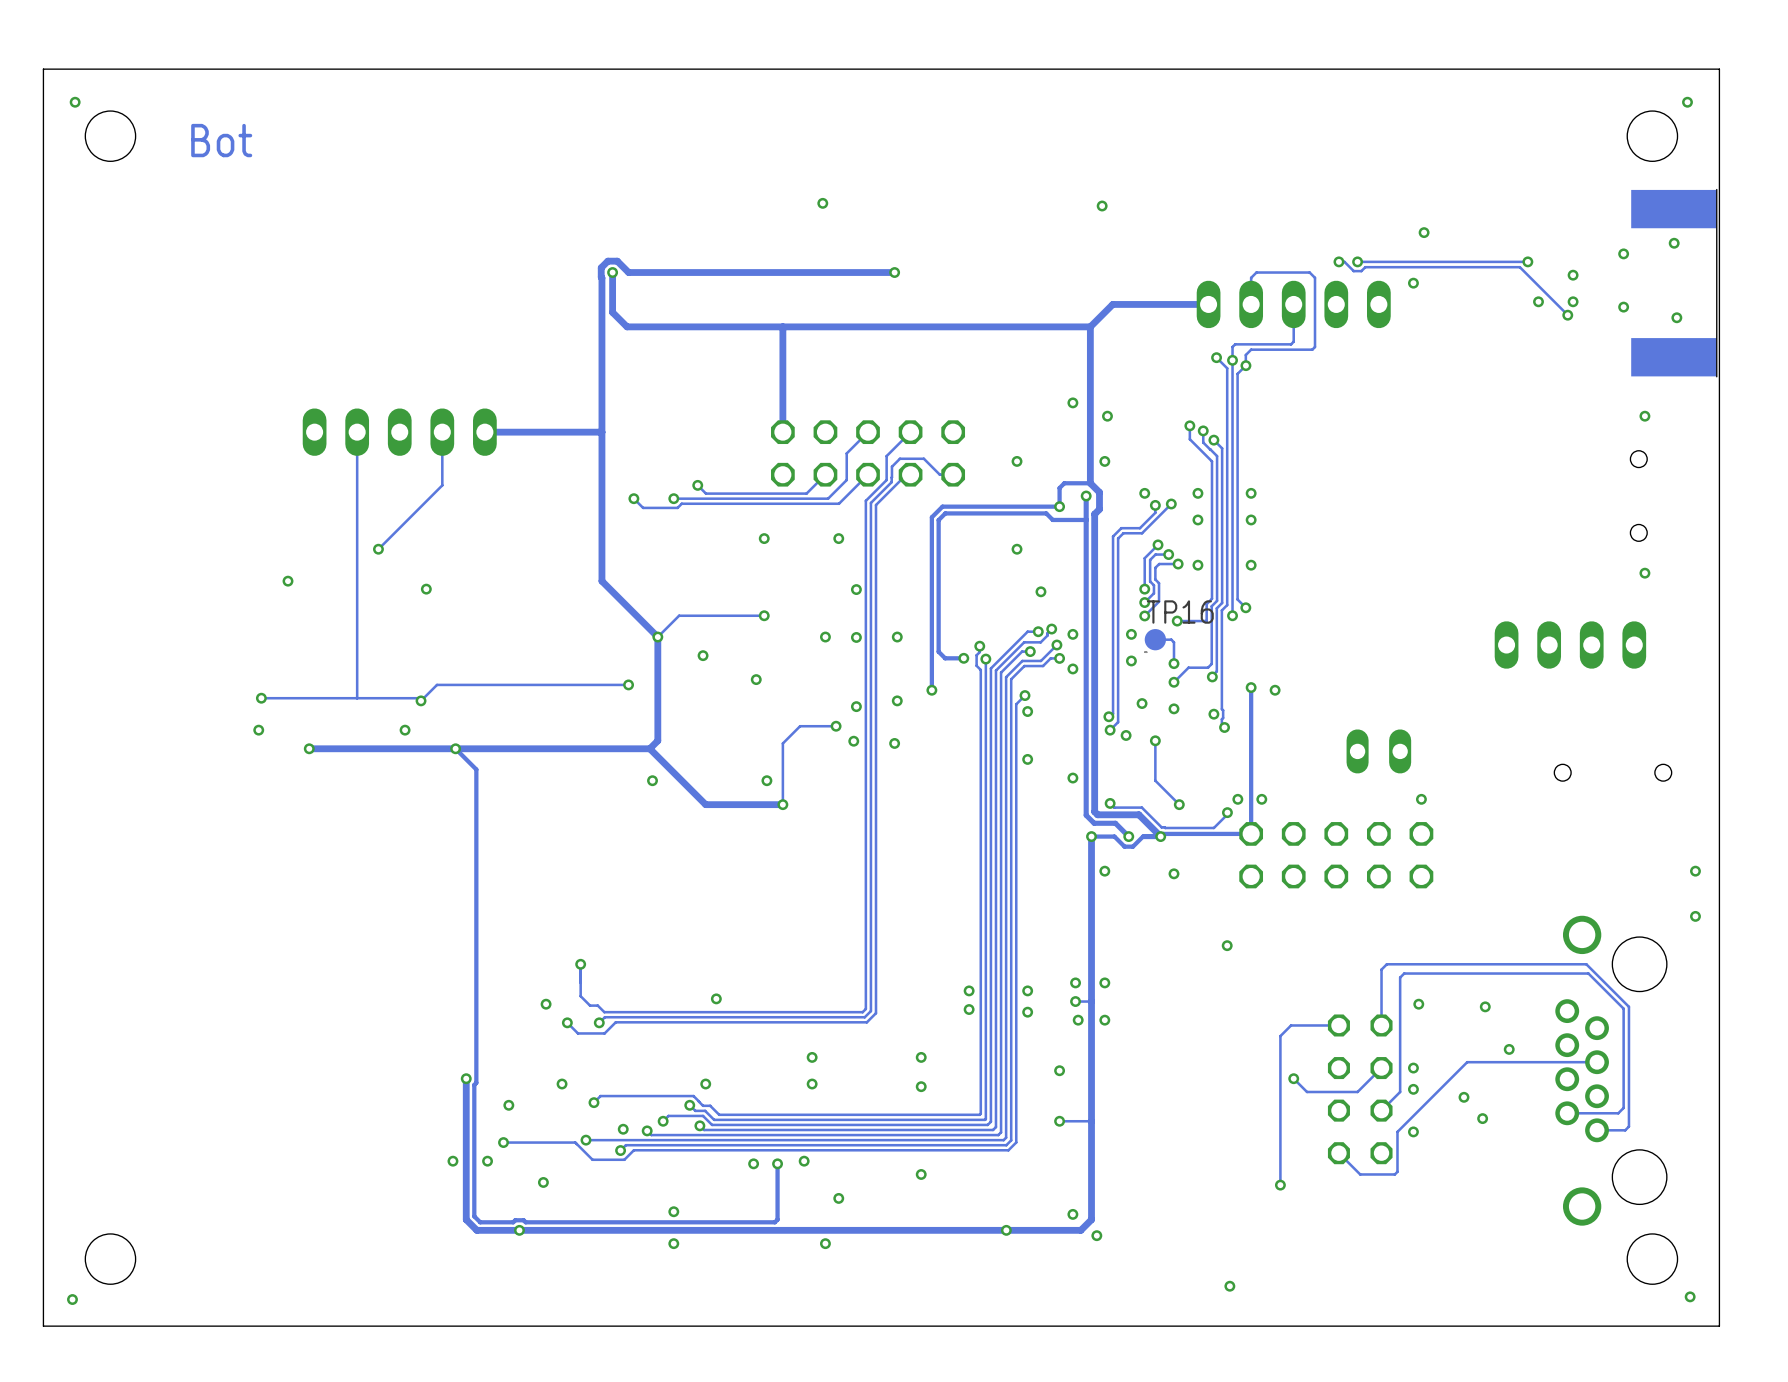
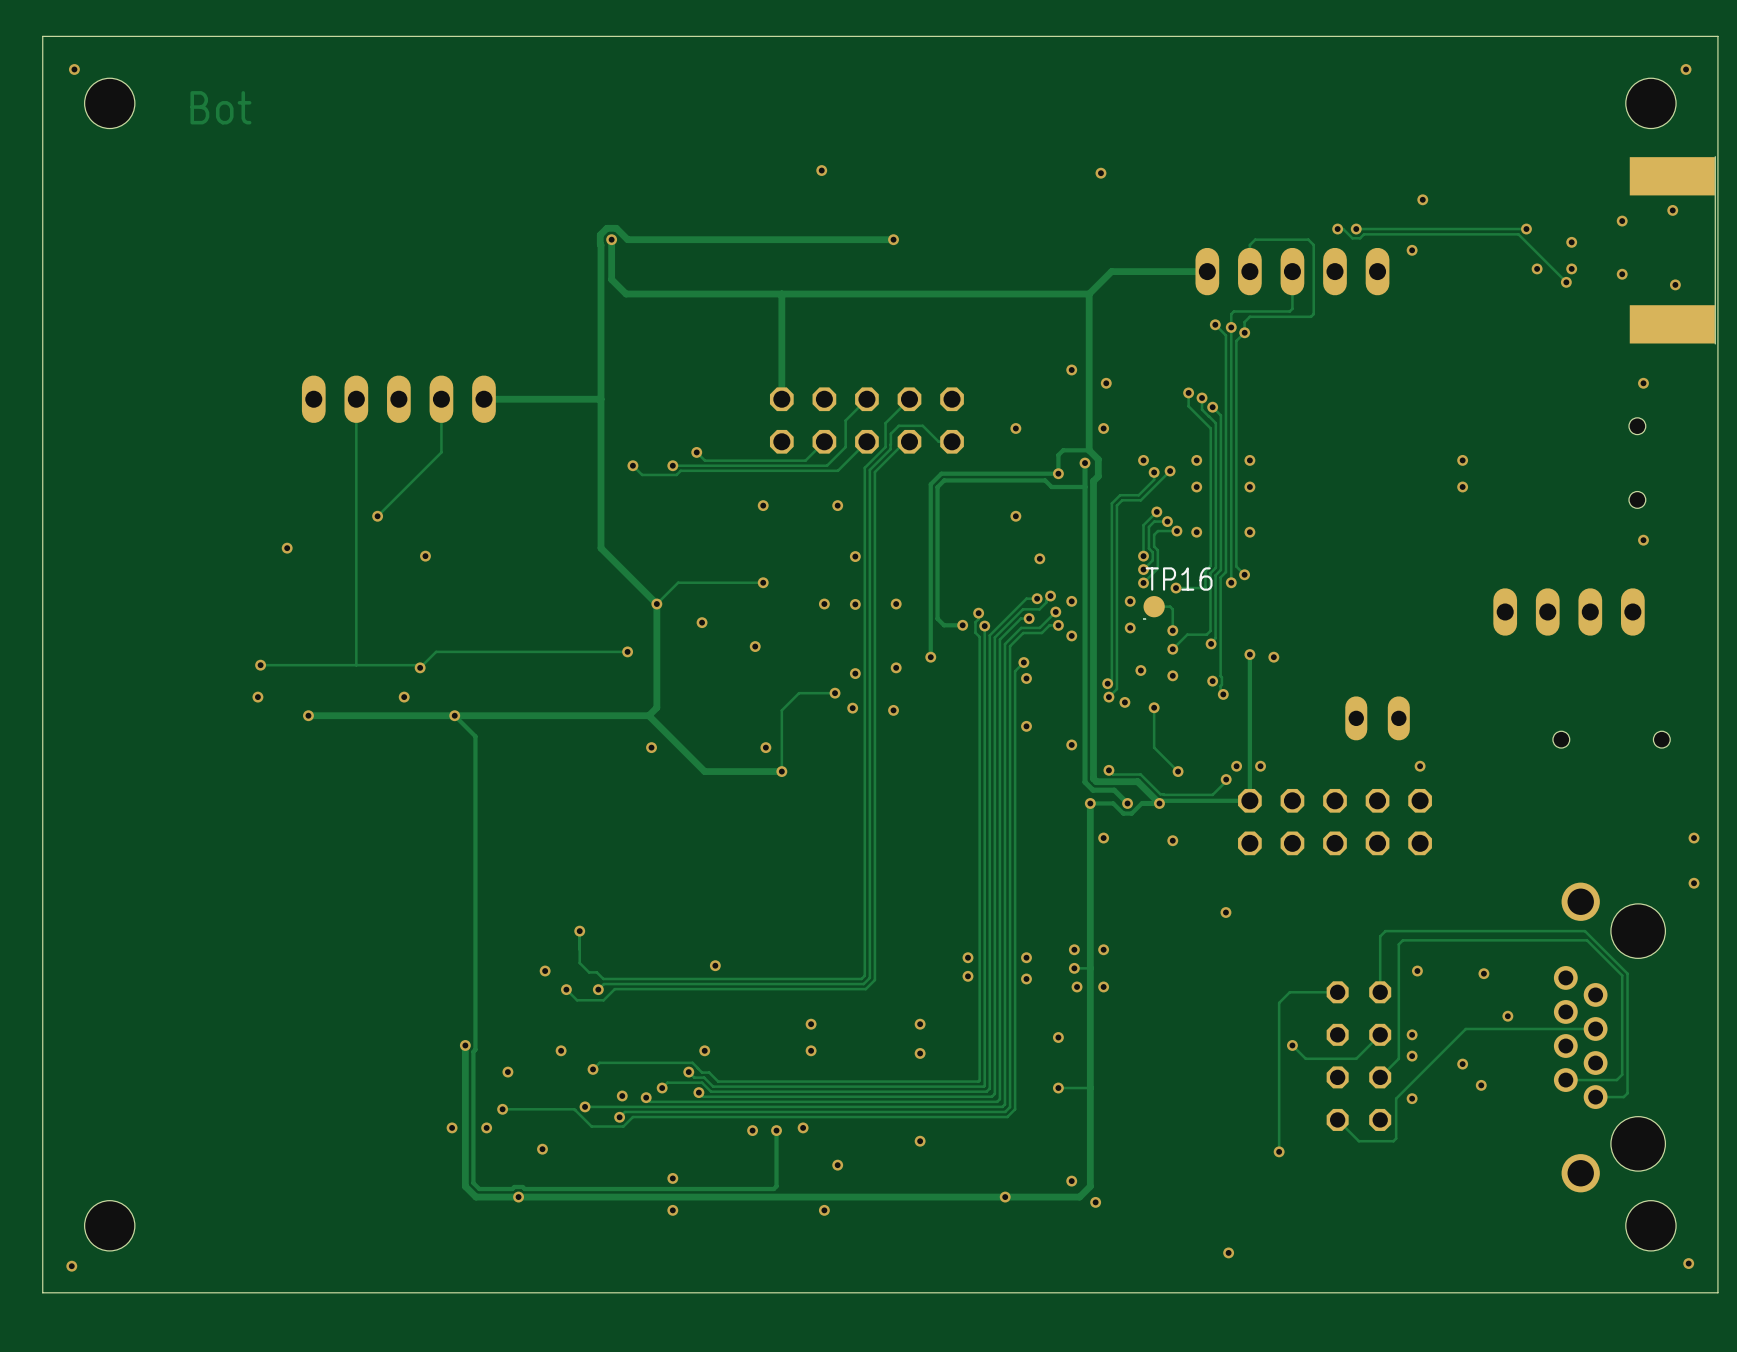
via: none -> (1462, 460)
via: none -> (1462, 487)

